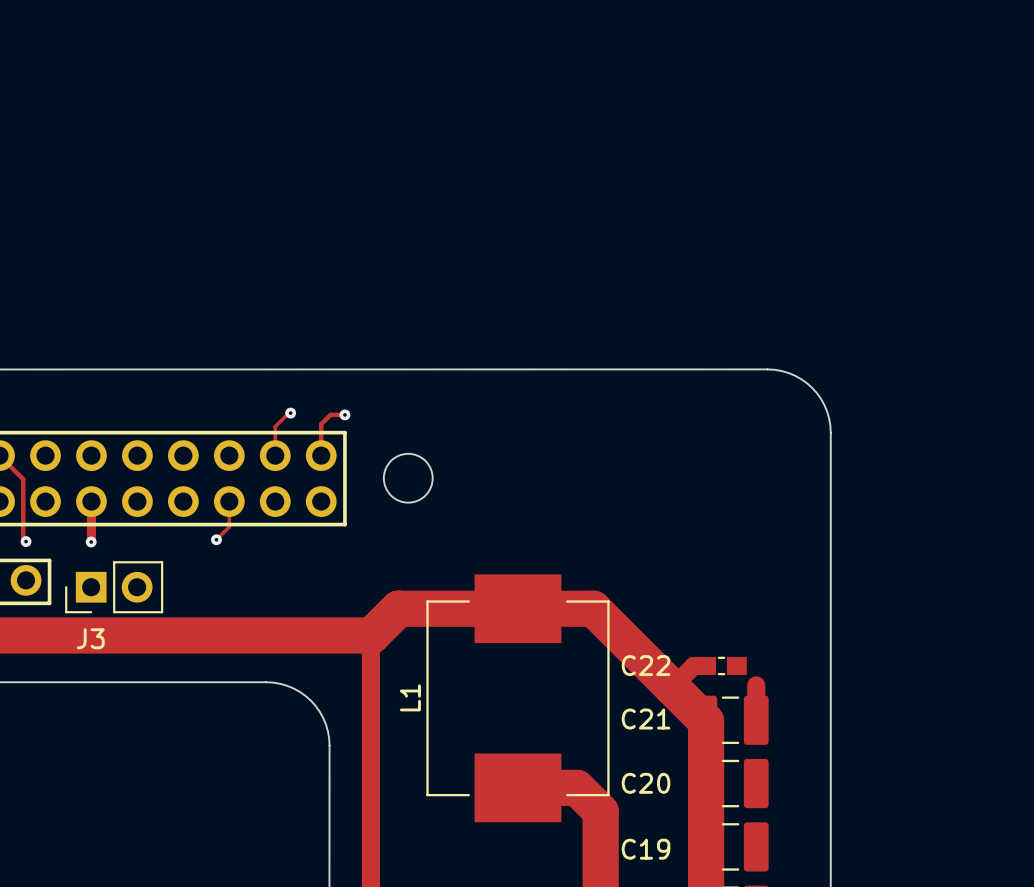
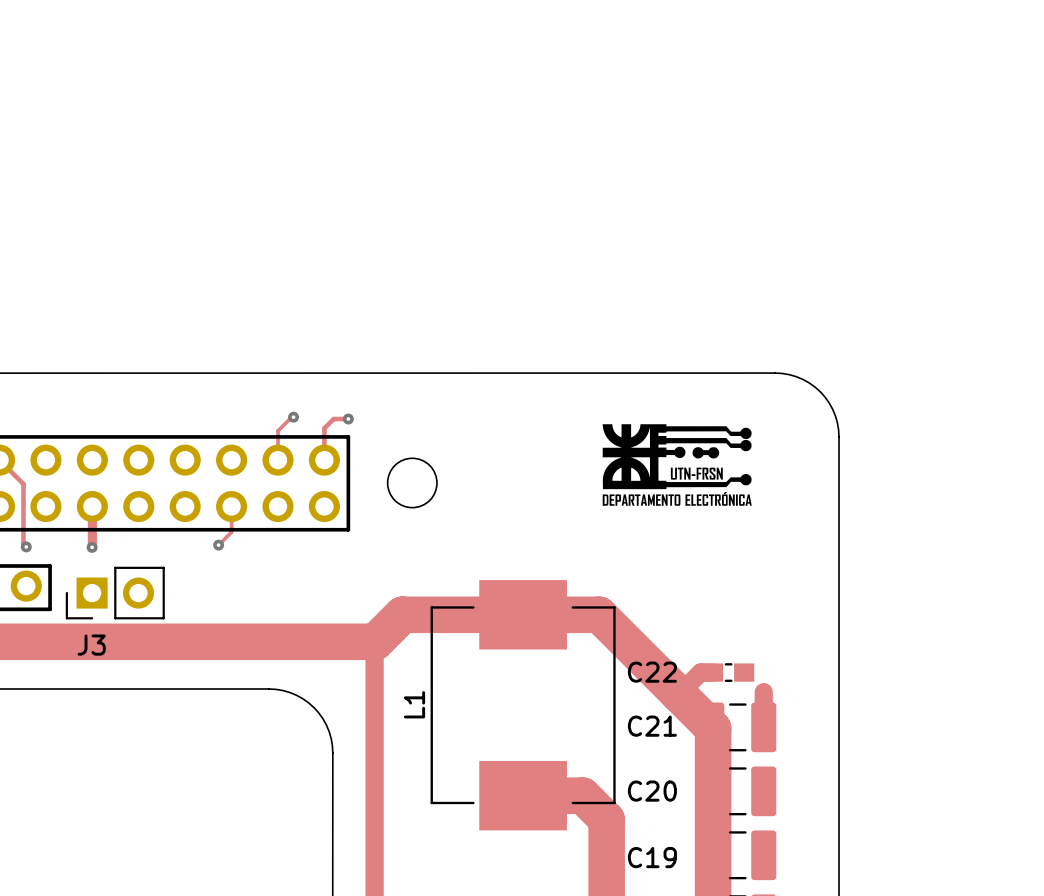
drawing: none -> [602, 424, 752, 506]

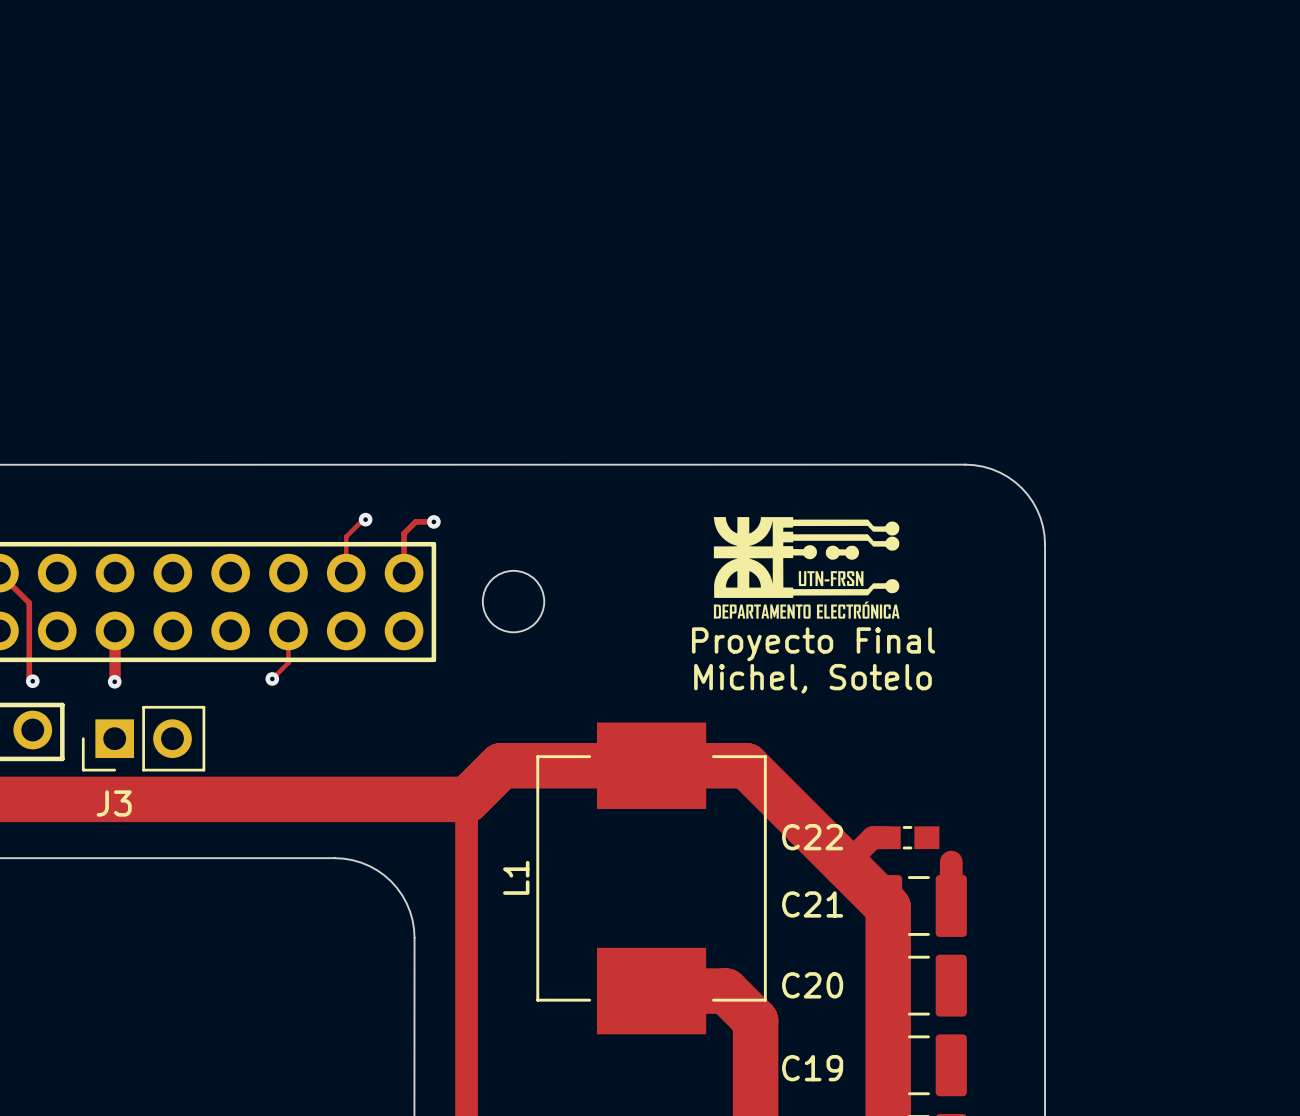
drawing position: (677, 465) -> (806, 567)
text: none -> Proyecto Final (813, 644)
text: none -> Michel, Sotelo (812, 678)

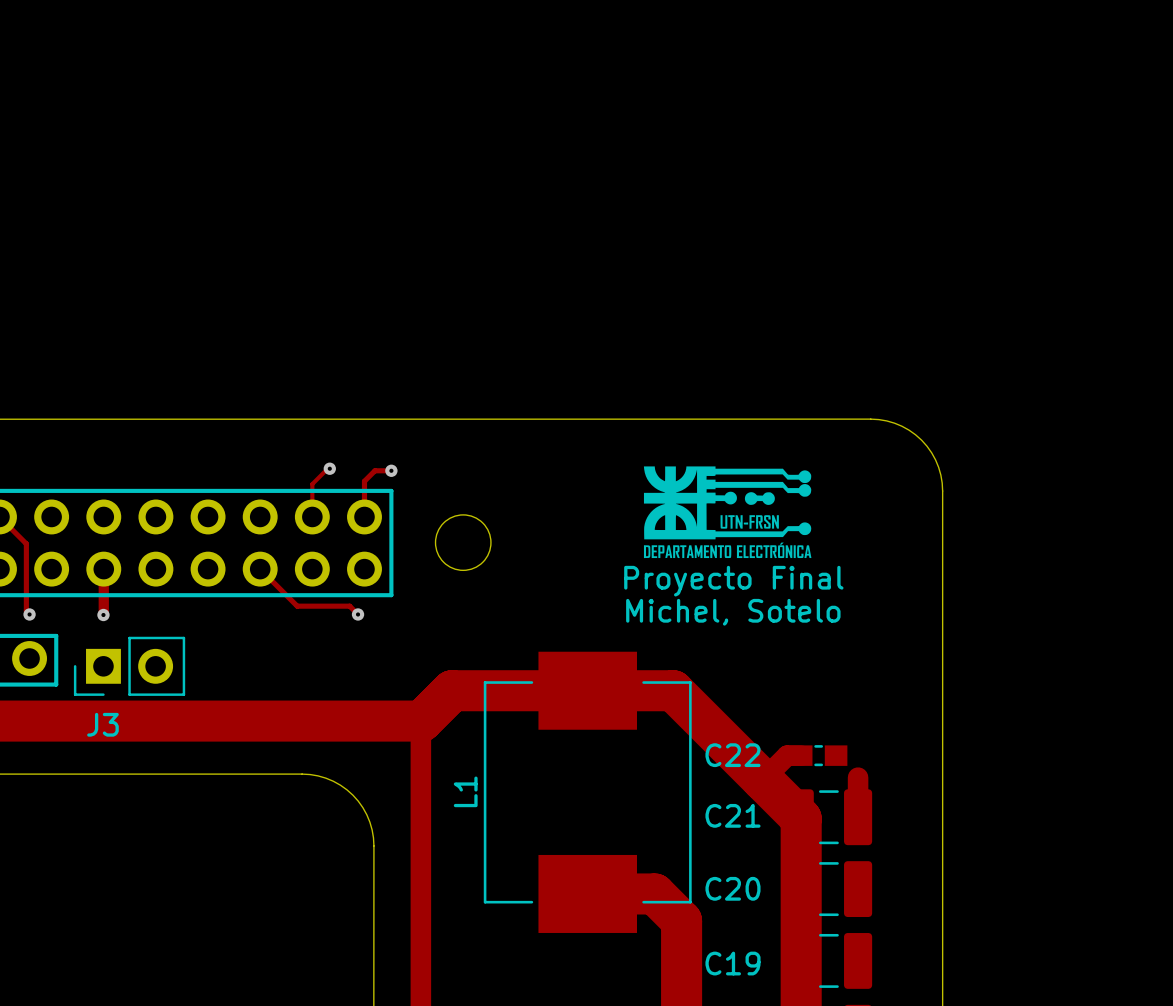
track: (288, 630) (288, 662) (272, 678) -> (260, 569) (297, 606) (349, 606) (358, 614)
via position: (272, 678) -> (358, 614)

